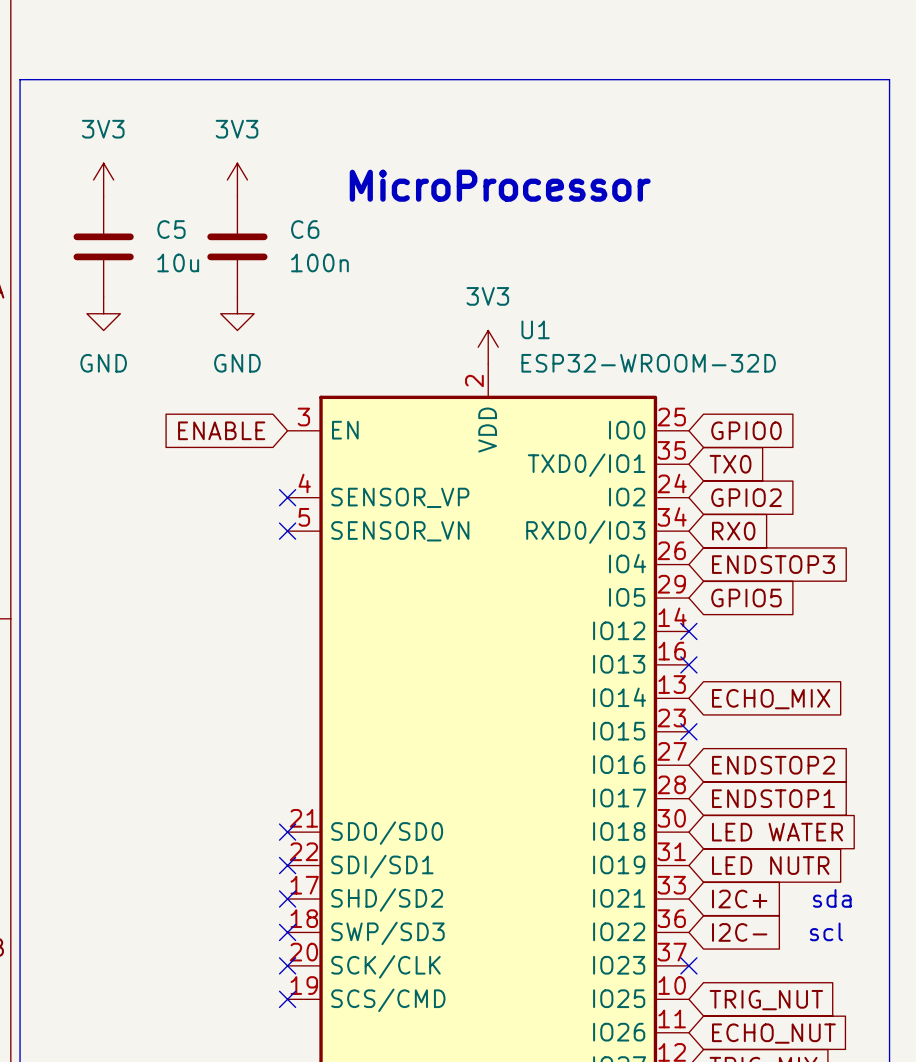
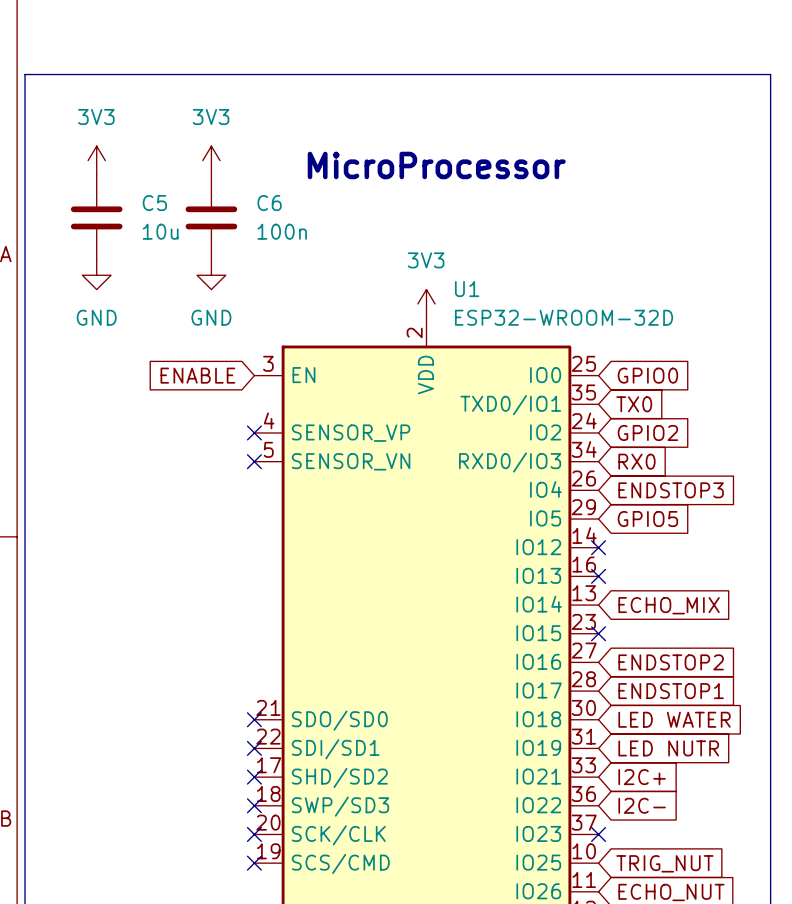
text: sda (832, 898) -> none
text: scl (826, 931) -> none

